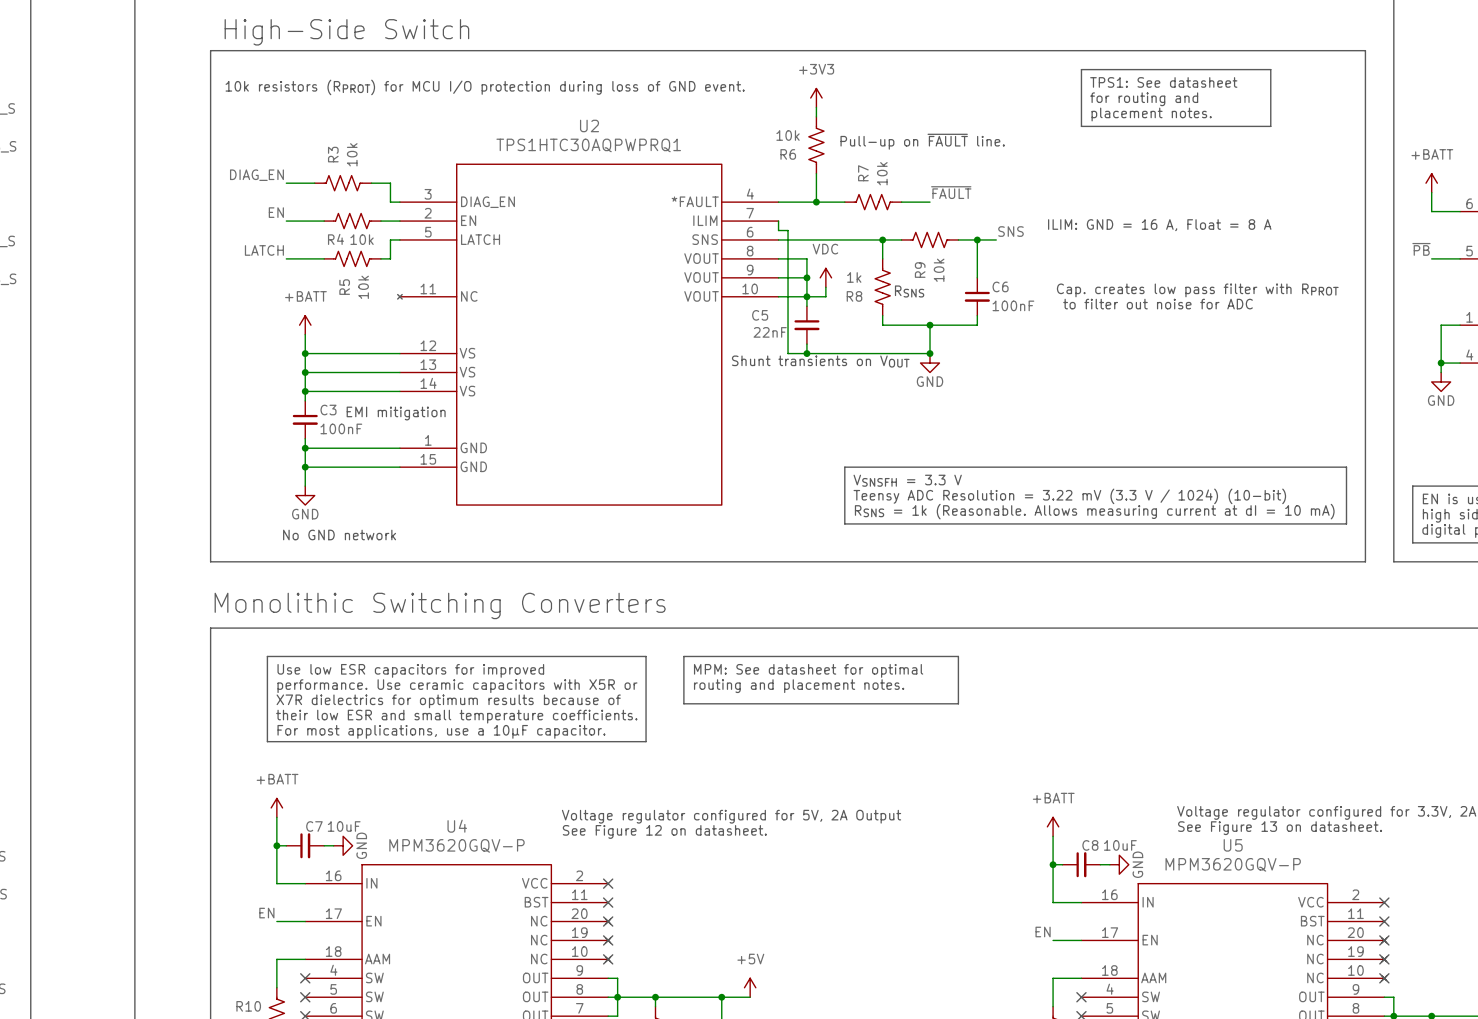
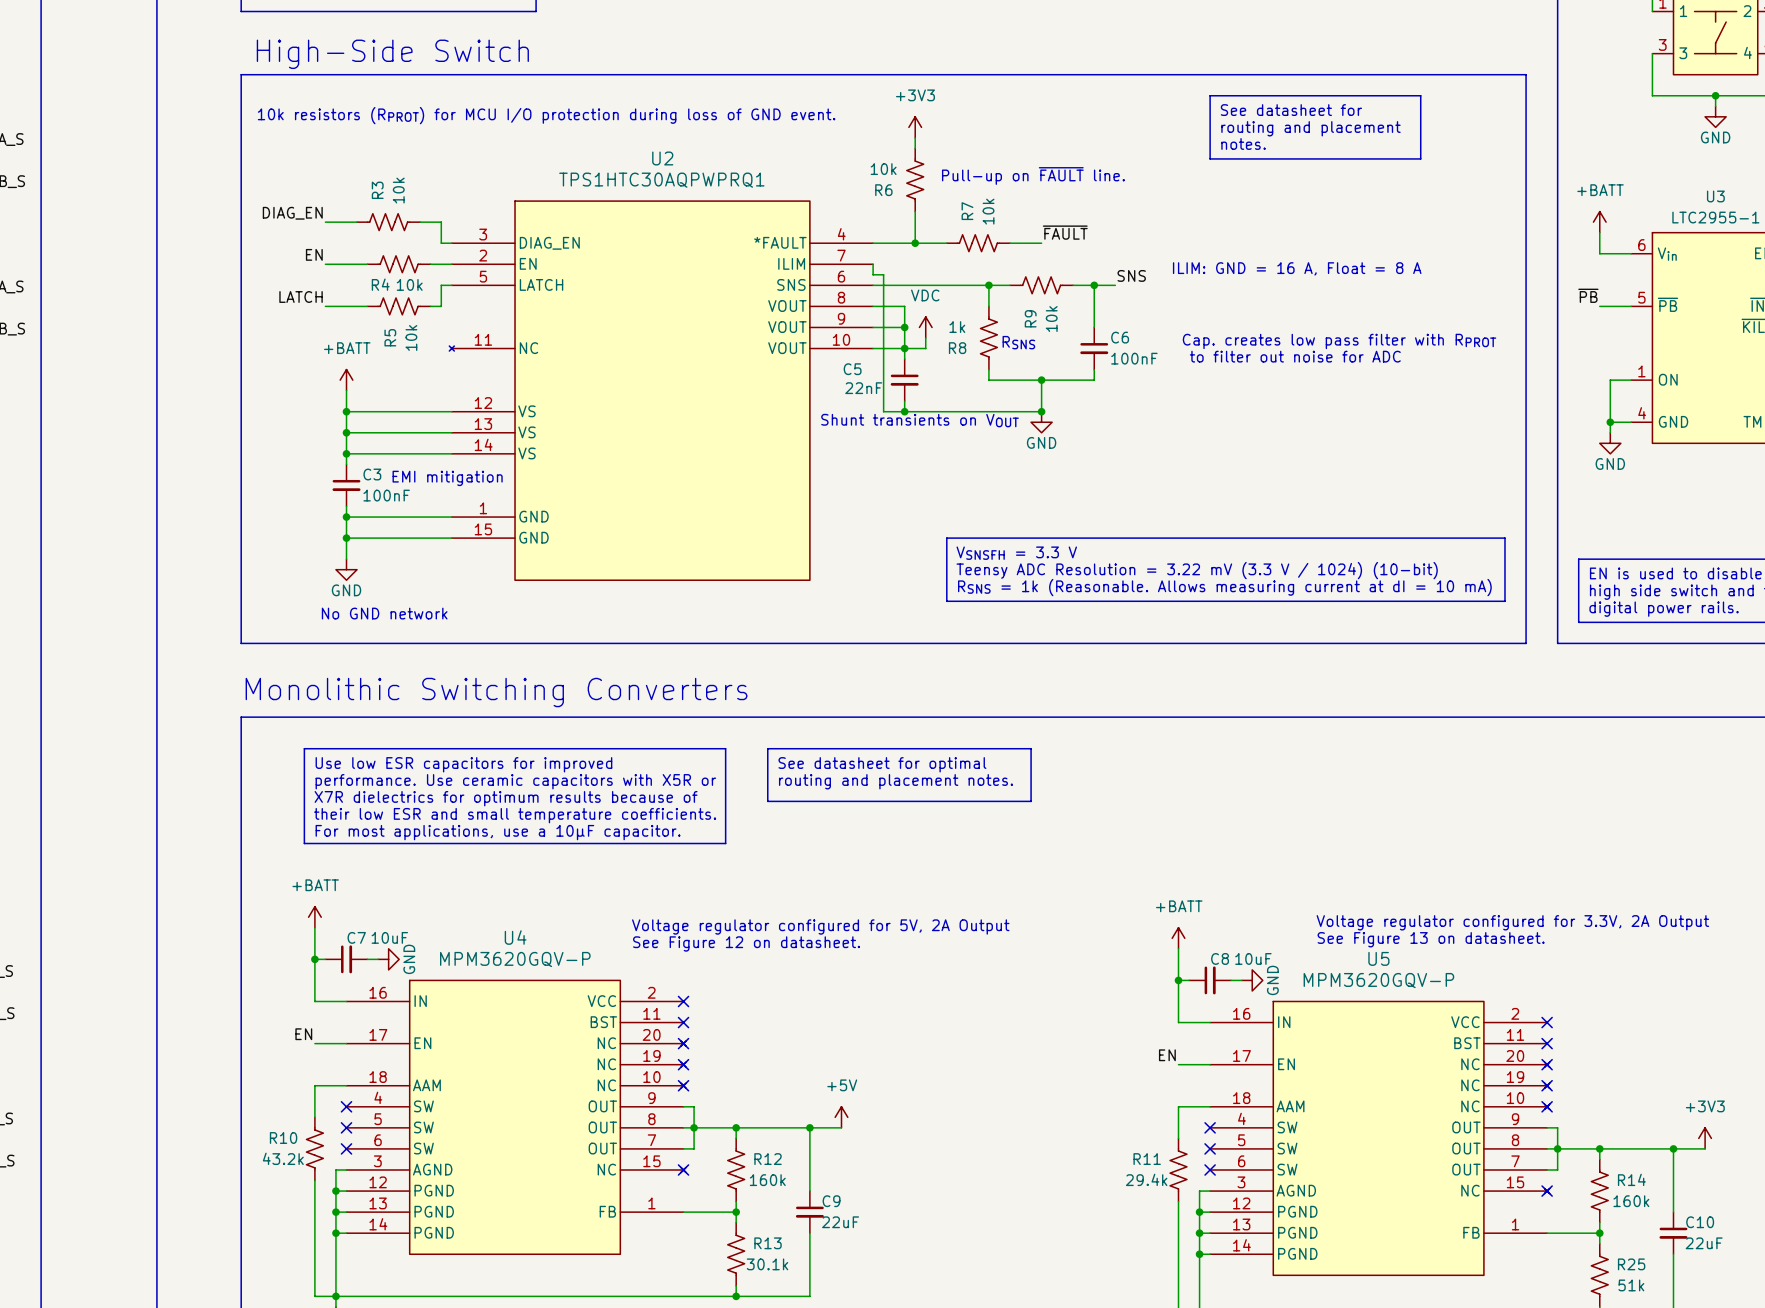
text: TPS1: See datasheet (1163, 82) -> See datasheet for (1291, 110)
text: for routing and (1144, 99) -> routing and placement (1310, 128)
text: placement notes. (1151, 114) -> notes. (1243, 143)
line: (920, 656) (958, 656) (958, 703) (920, 703) -> (1031, 748) (1031, 801)
text: MPM: See datasheet for optimal (808, 670) -> See datasheet for optimal (882, 764)

